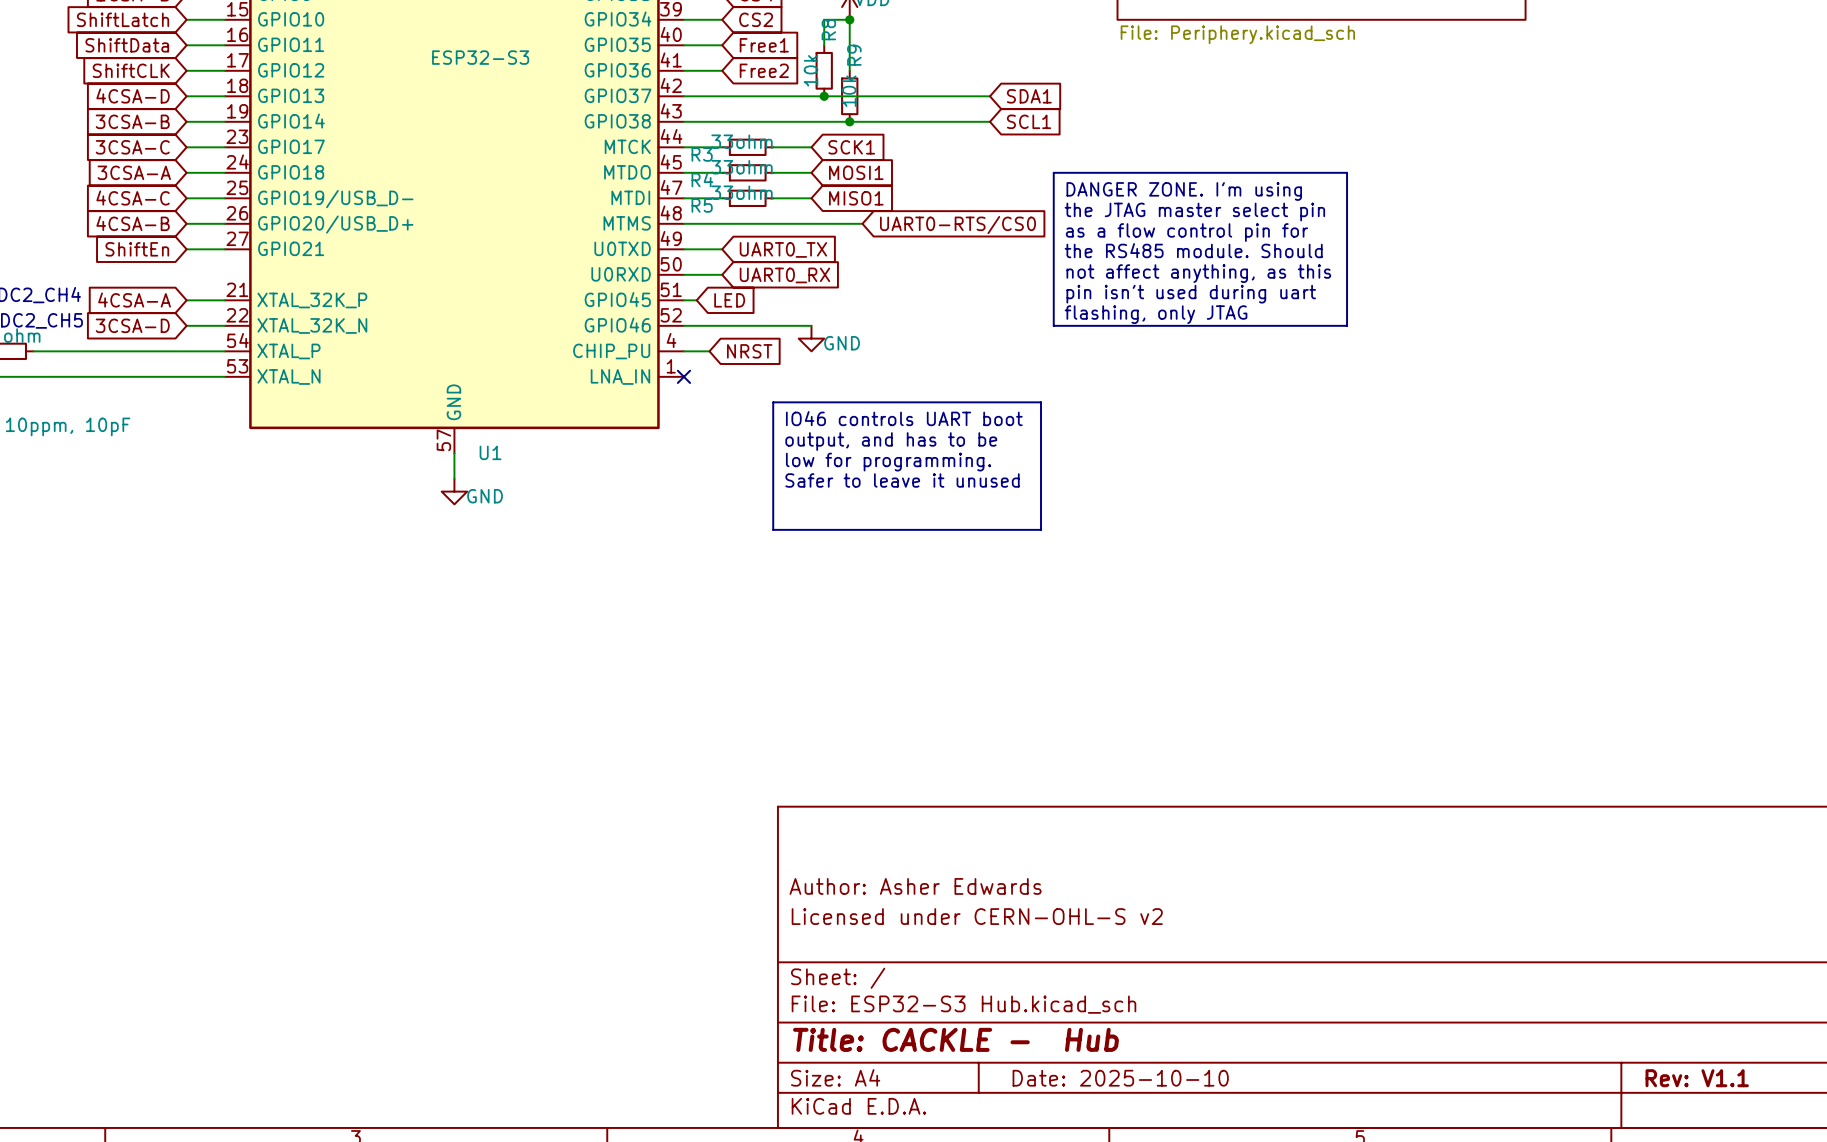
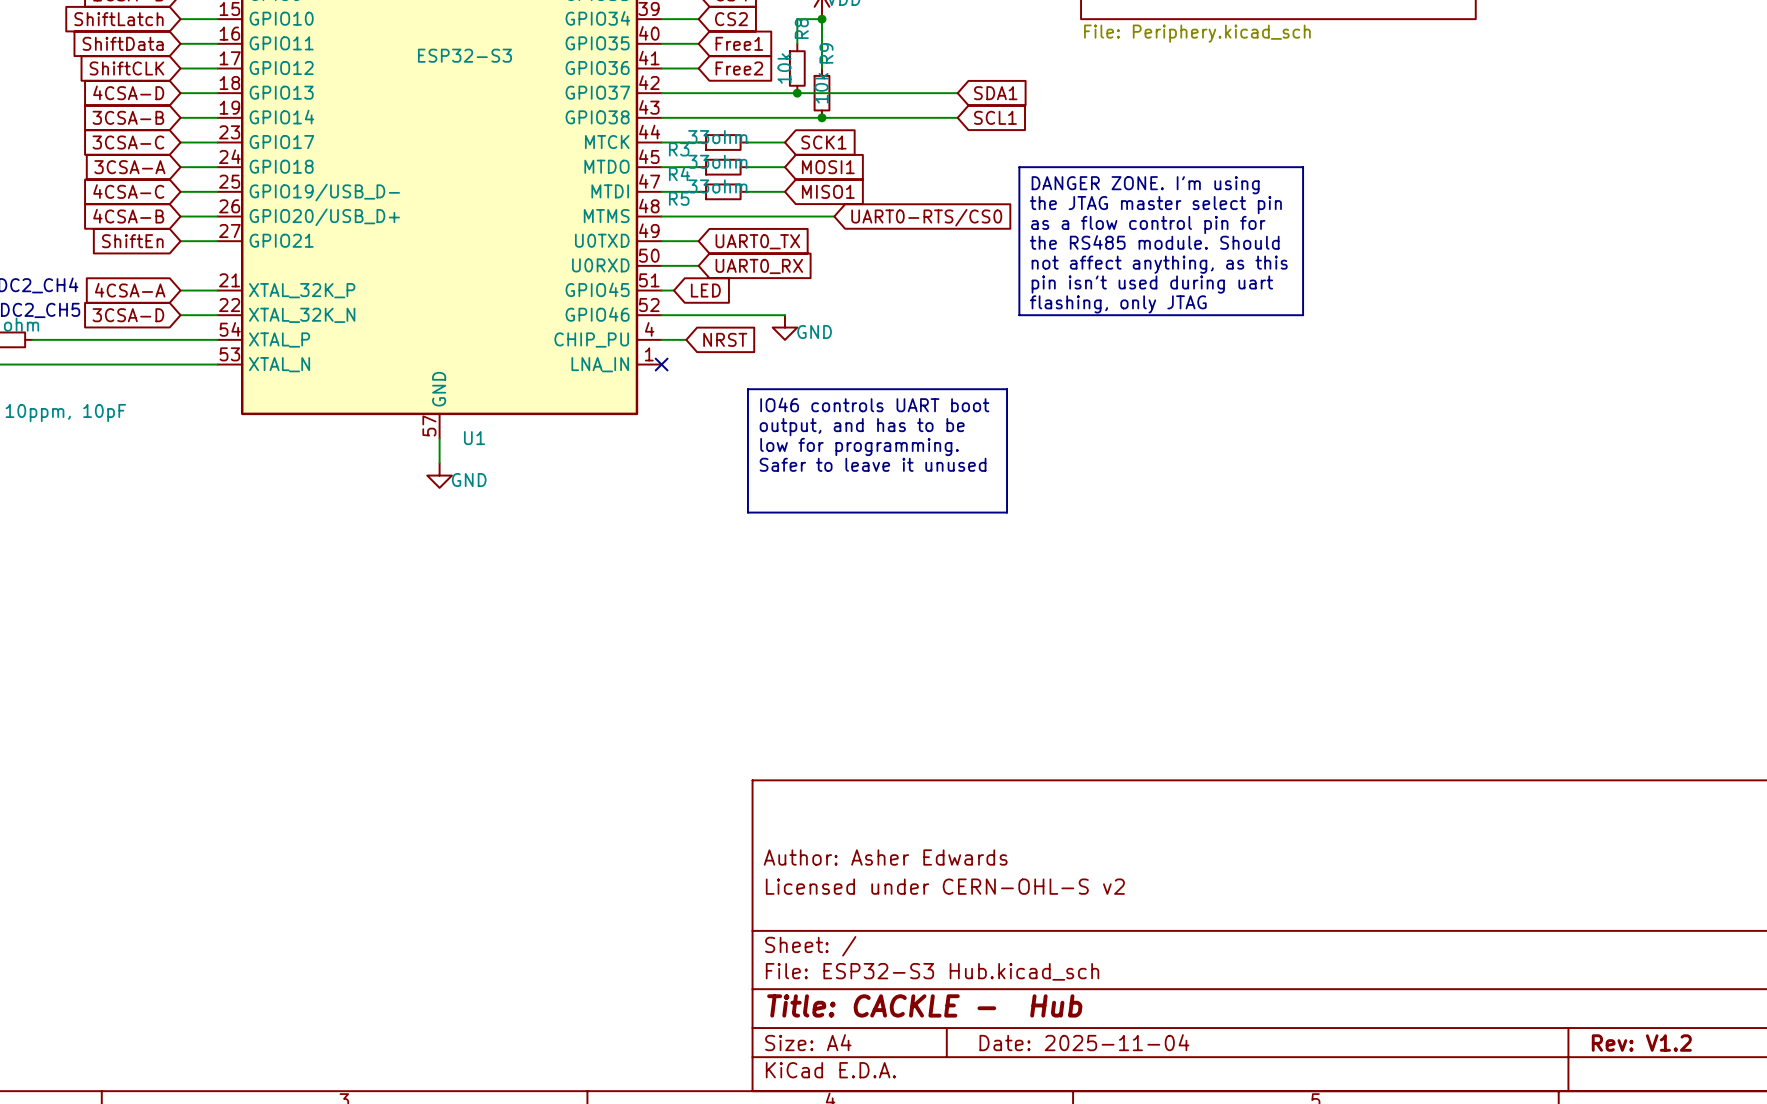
title block: Date: 2025-10-10 (1120, 1078) -> Date: 2025-11-04 (1084, 1042)
title block: Rev: V1.1 (1697, 1078) -> Rev: V1.2 (1641, 1043)

